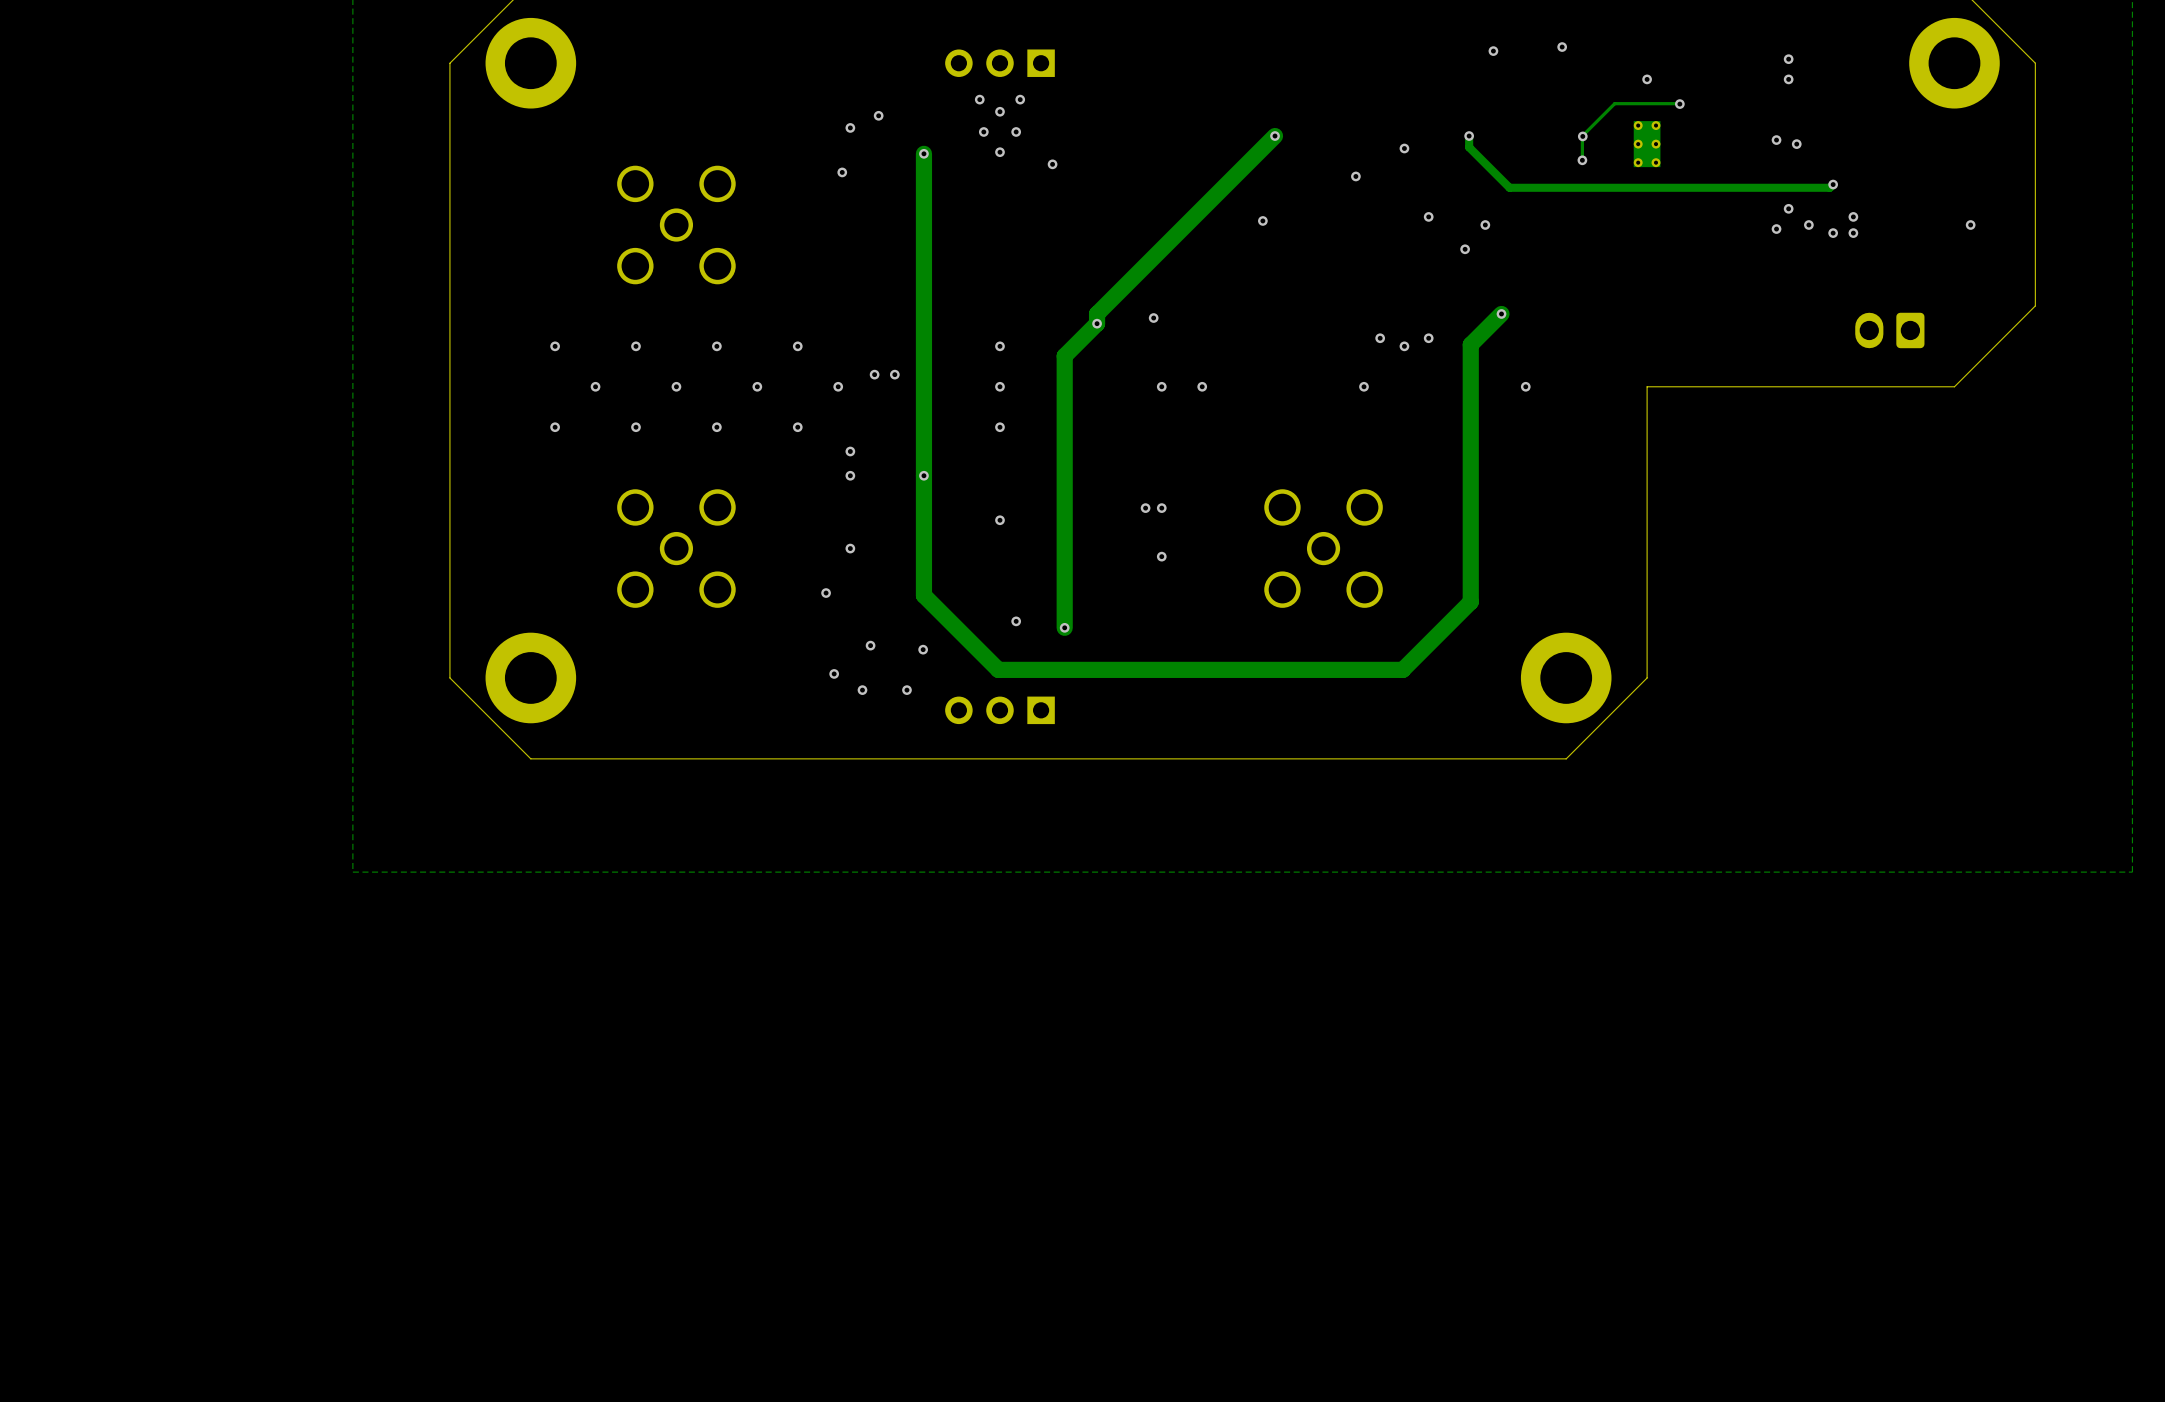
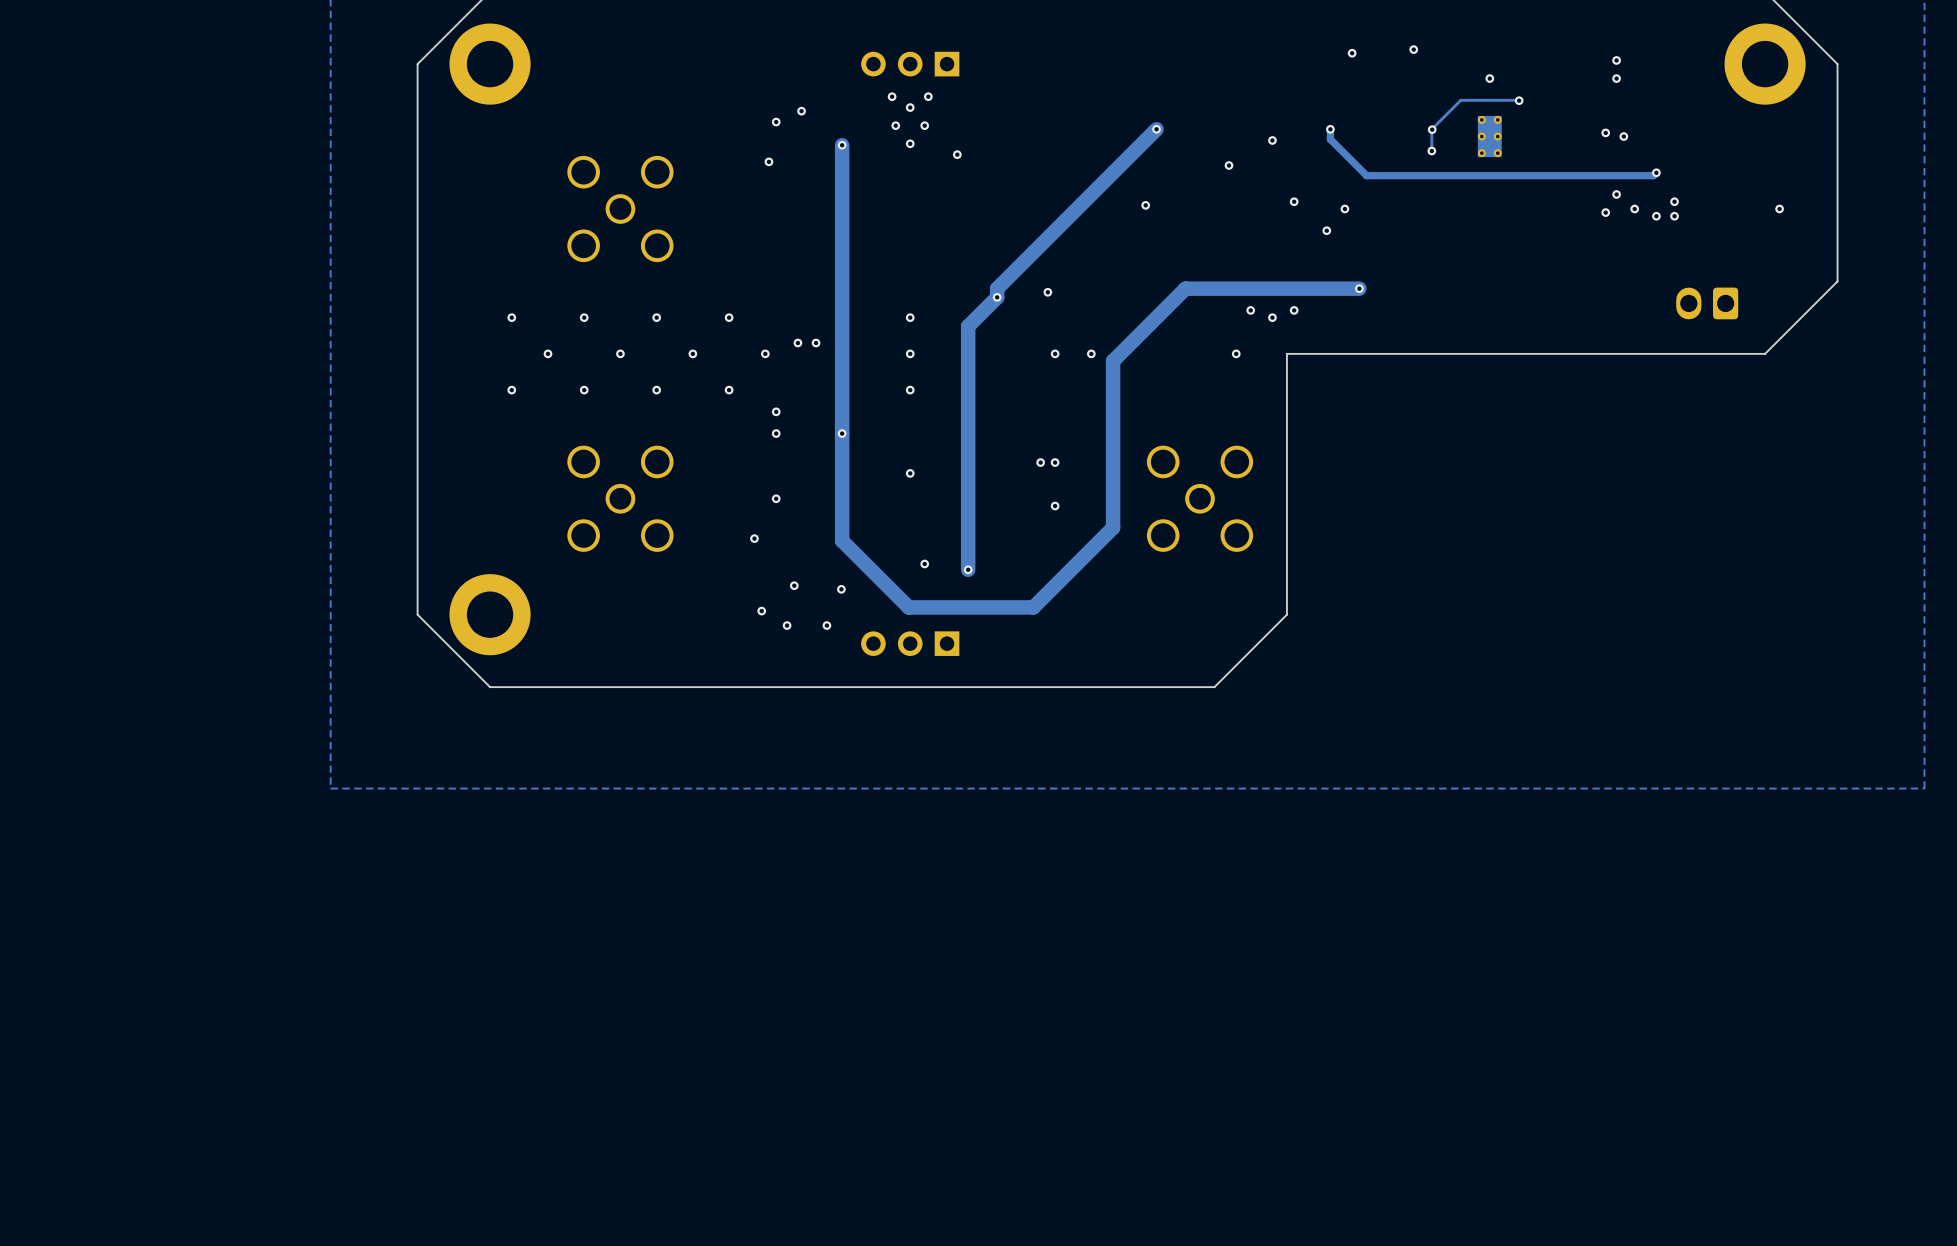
track: (1501, 313) (1470, 344) (1470, 601) (1402, 669) (1137, 669) -> (1359, 288) (1185, 288) (1113, 361) (1113, 527) (1033, 607)
via: (1525, 386) -> none
board edge: (1647, 386) (1647, 677) (1566, 758) (1339, 758) -> (1489, 353) (1286, 353) (1286, 614) (1214, 687)
part: (1566, 677) -> none

